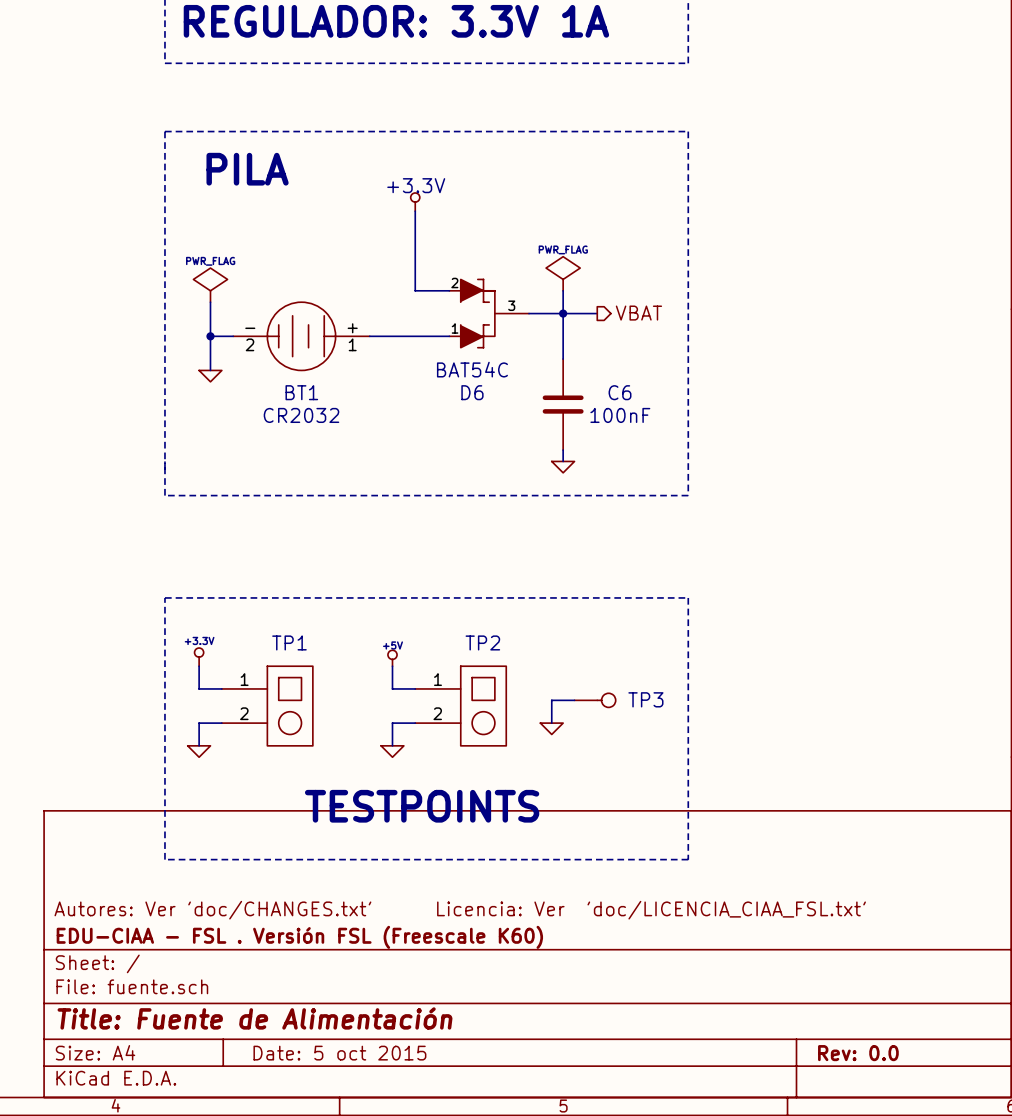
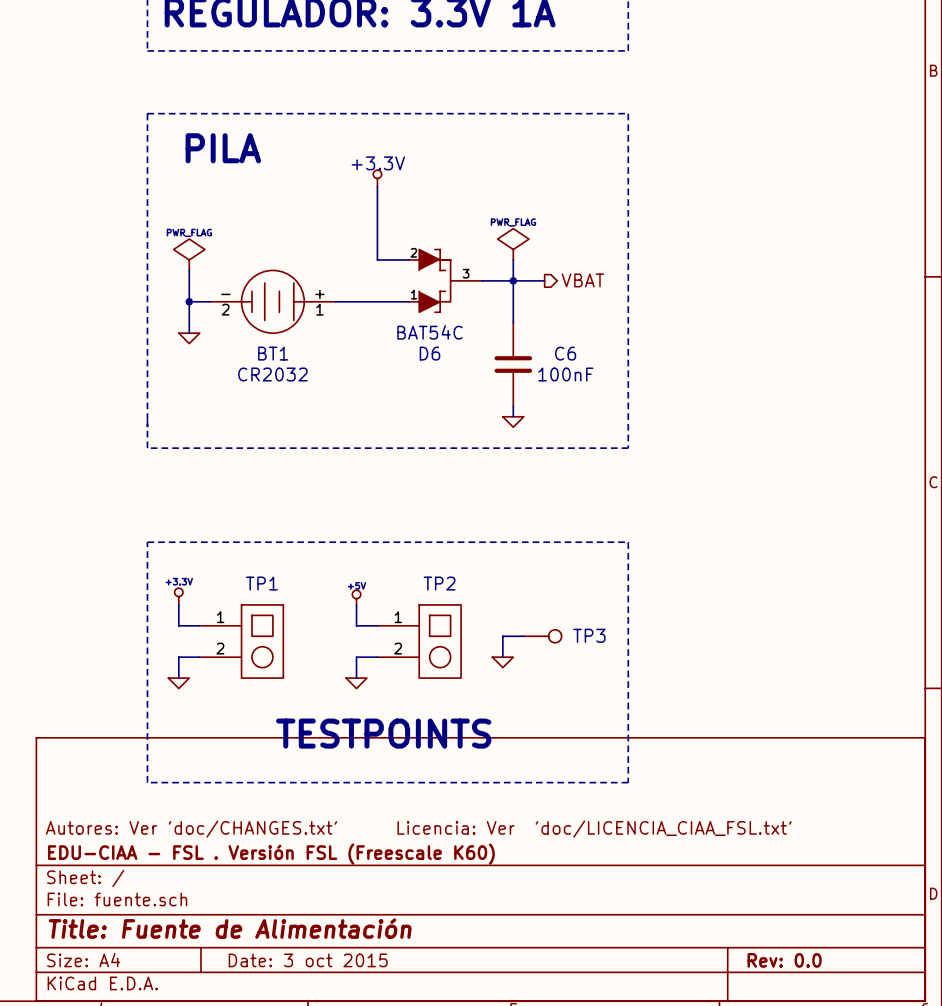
title block: Date: 5 oct 2015 (339, 1053) -> Date: 3 oct 2015 (308, 960)

